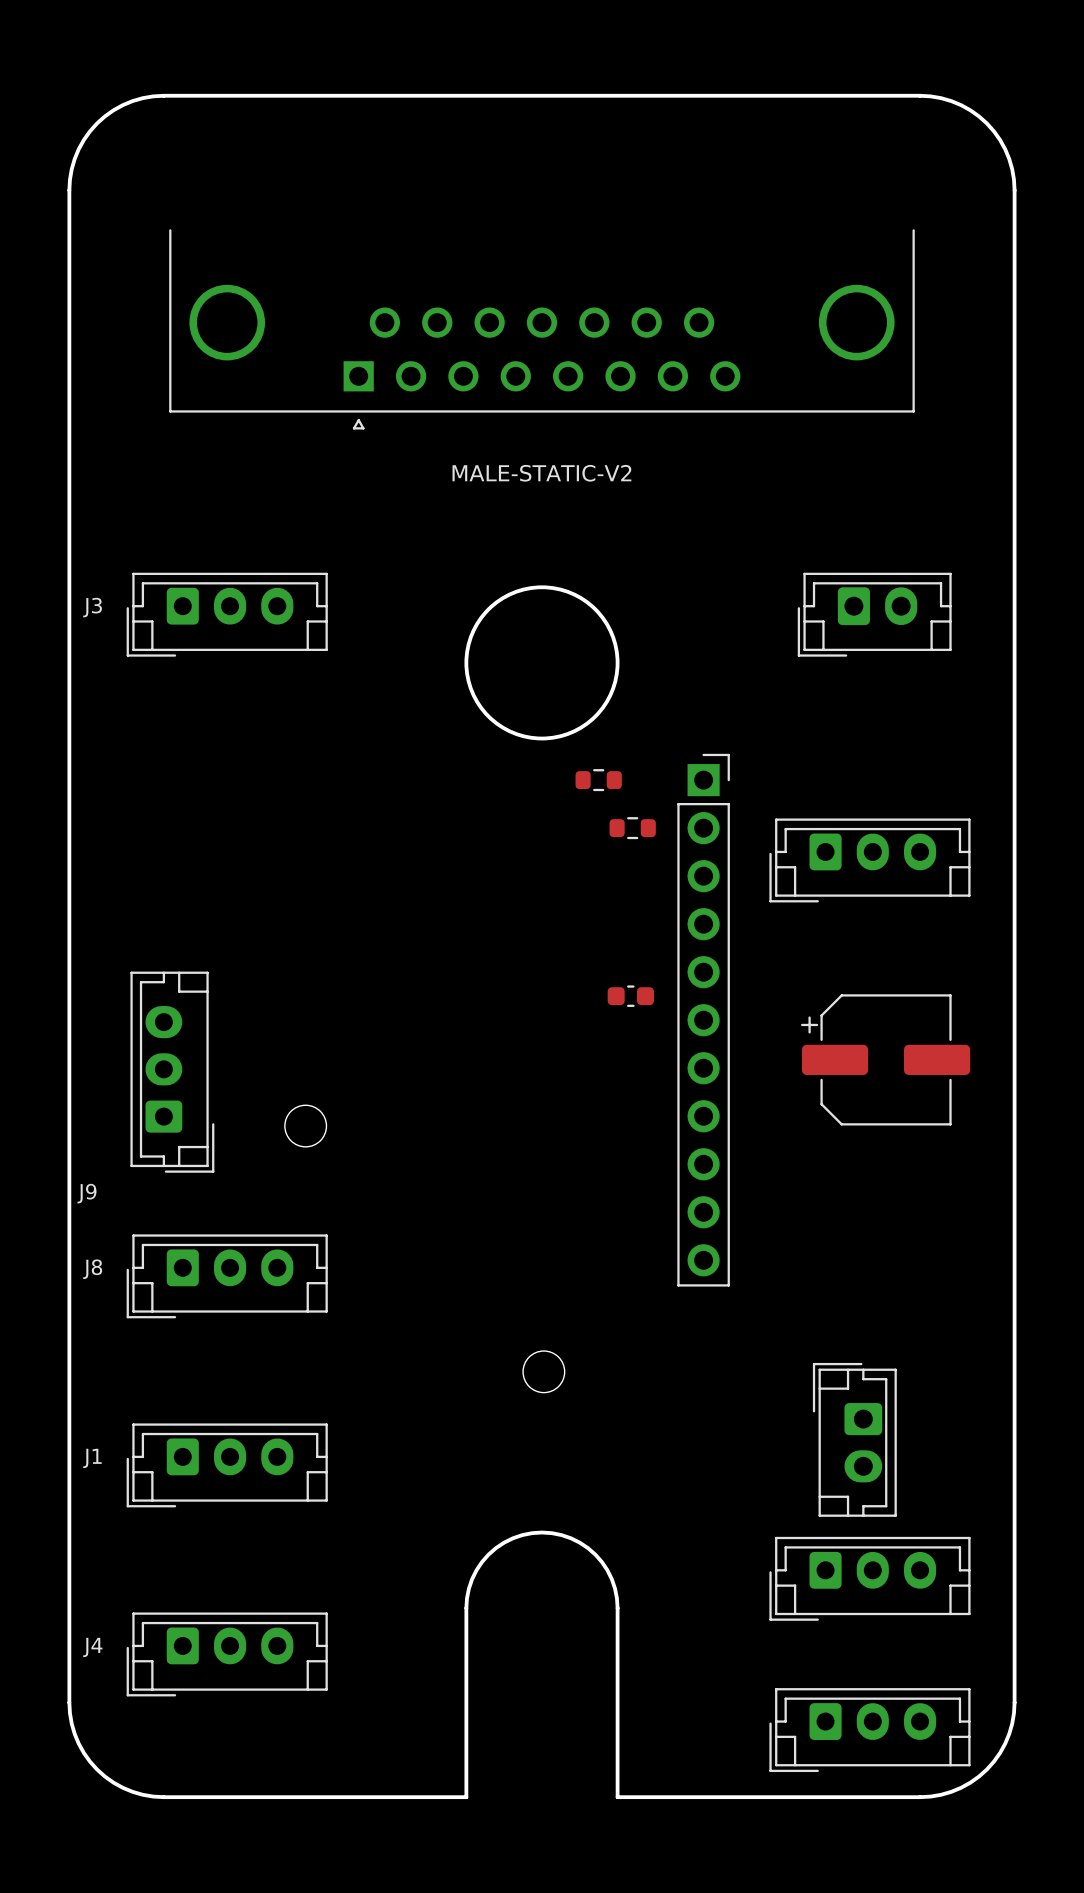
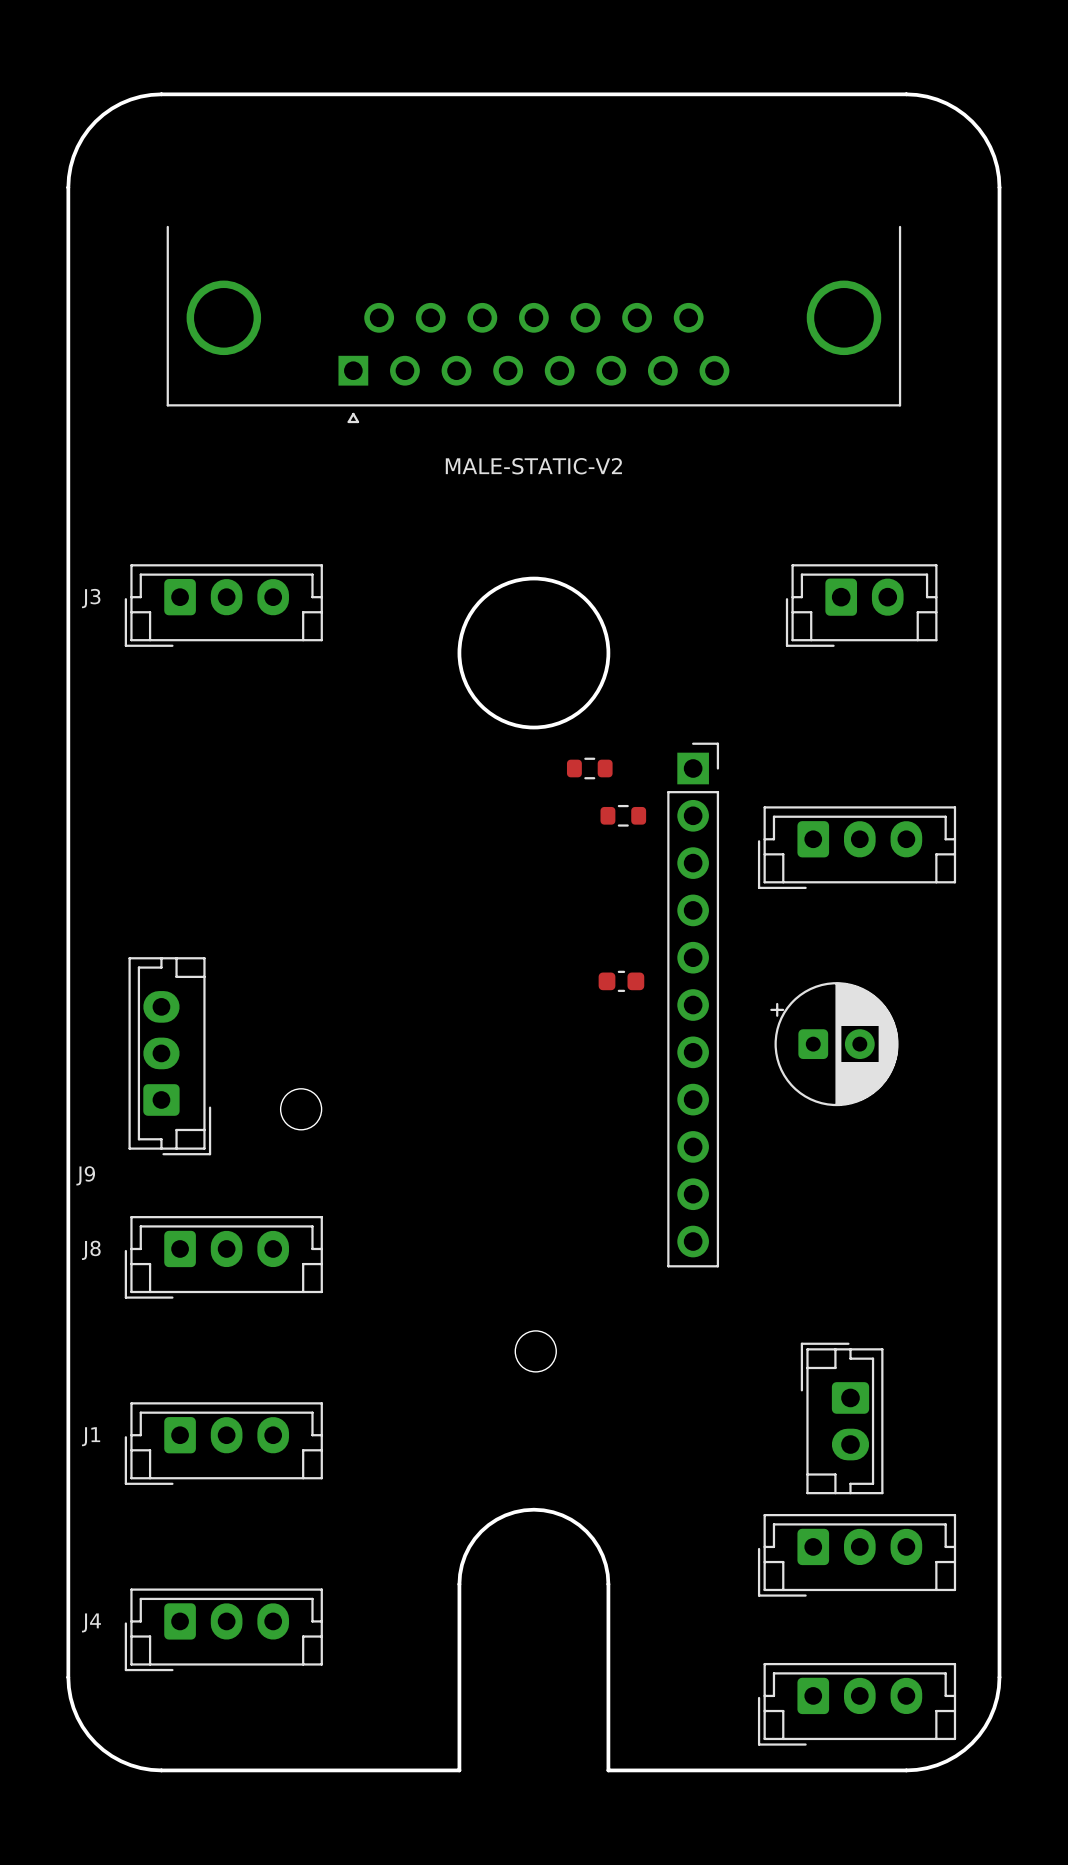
part: none -> (834, 1044)
part: (885, 1059) -> none

